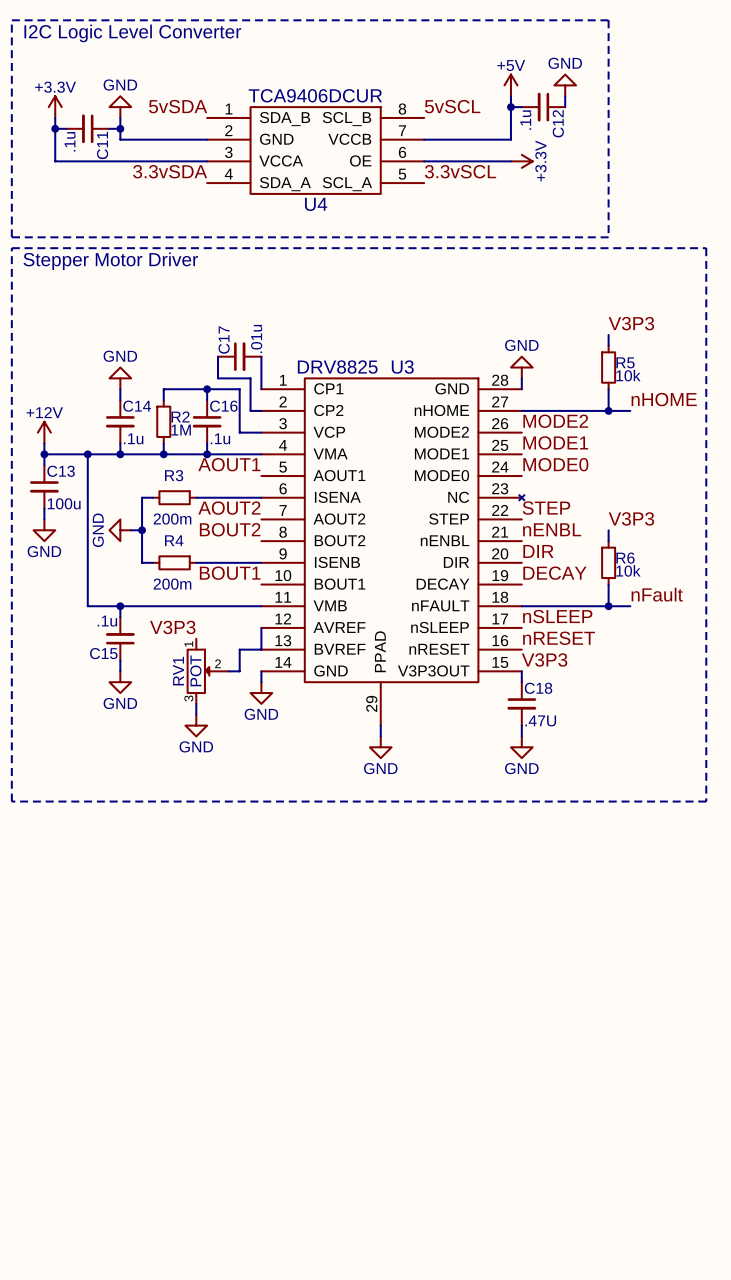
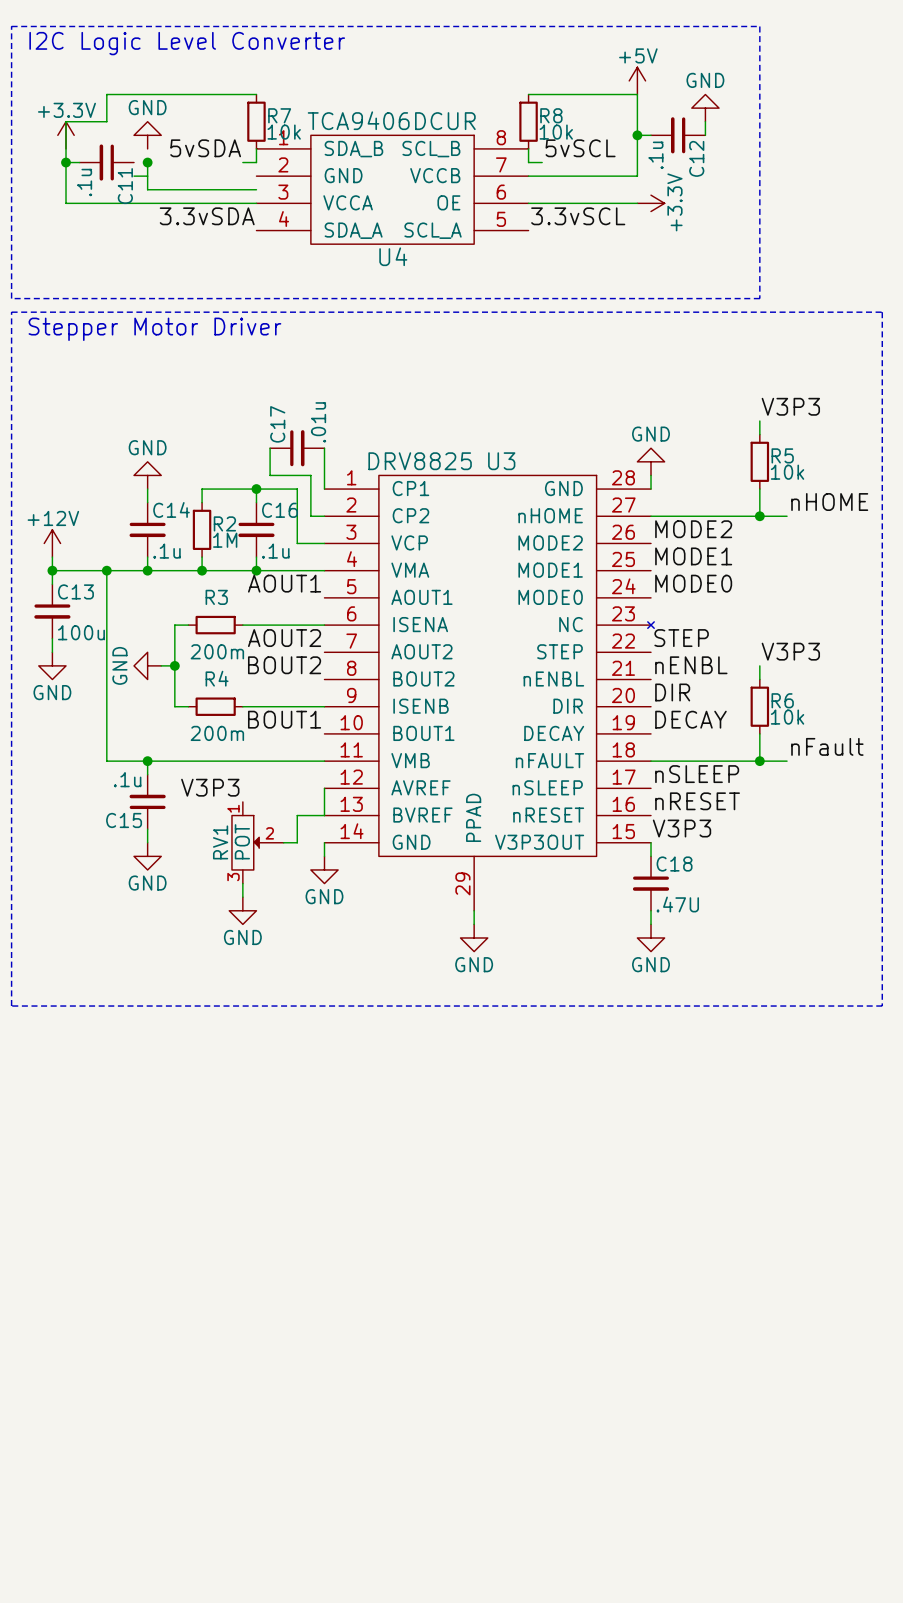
wire: none -> (256, 94) (106, 94) (106, 121) (66, 121) (66, 148)
wire: none -> (528, 94) (637, 94) (637, 121)
power symbol position: +5V (510, 85) -> +5V (637, 80)
R7: none -> 10k (256, 121)
R8: none -> 10k (528, 121)
label position: 5vSDA (178, 106) -> 5vSDA (205, 148)
label position: 5vSCL (452, 106) -> 5vSCL (580, 148)
wire: (120, 117) (120, 128) (109, 128) -> (256, 148) (256, 162) (242, 162)
wire: none -> (528, 148) (528, 162) (542, 162)
wire: none -> (134, 176) (147, 176) (147, 189) (256, 189)
wire: (120, 139) (207, 139) -> none

